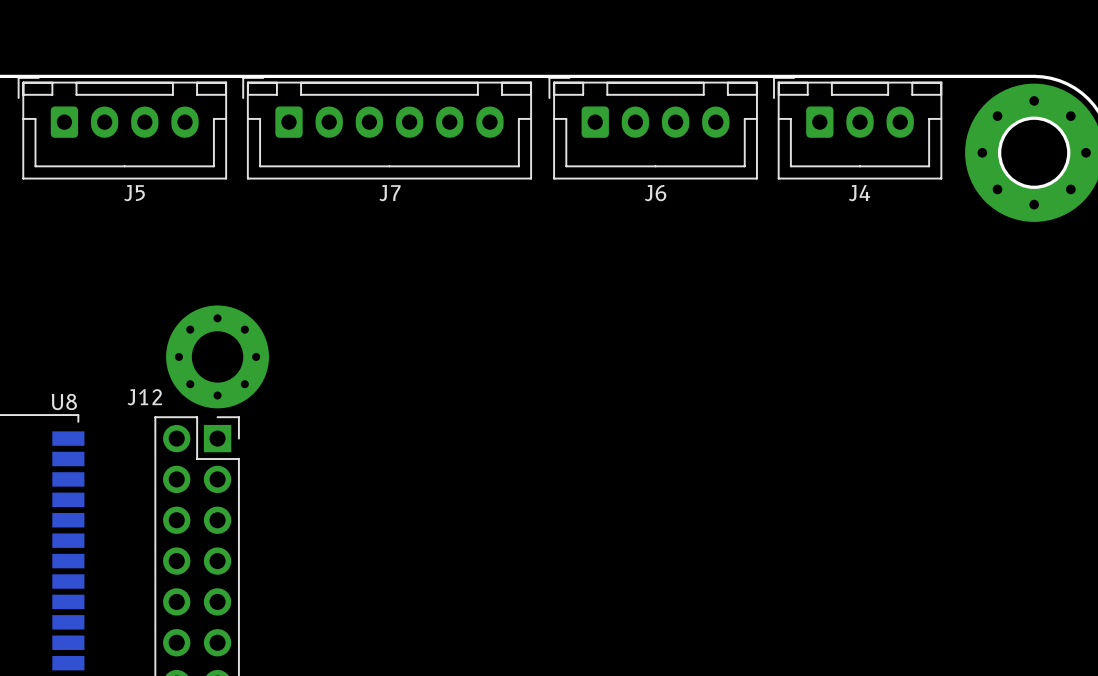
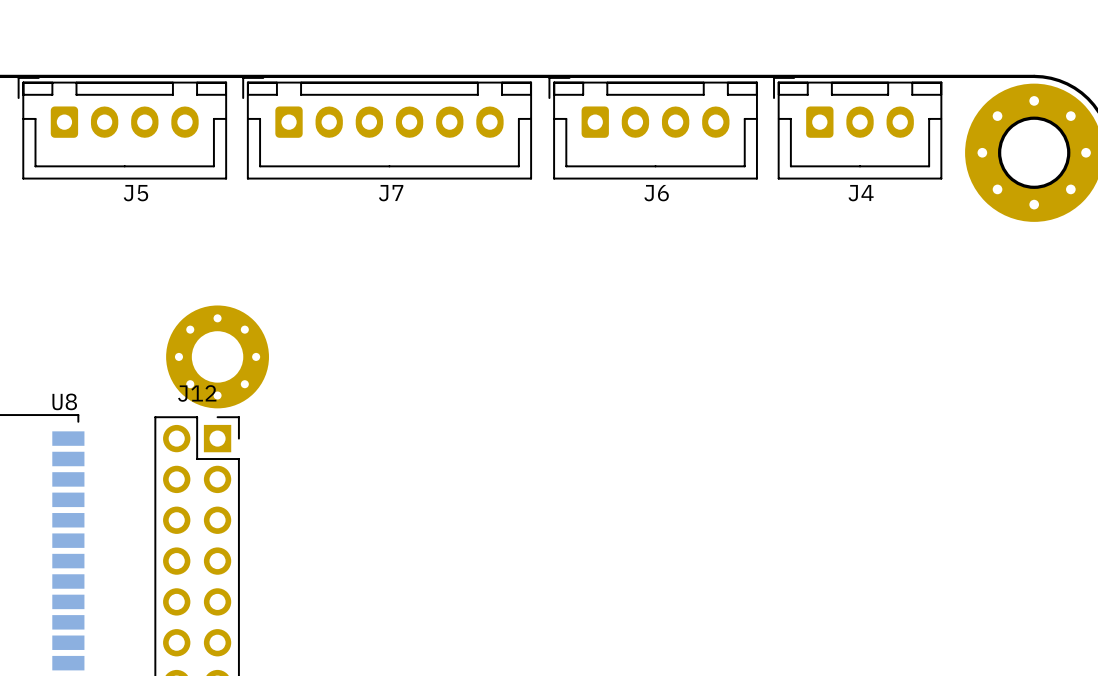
J12 name position: J12 (144, 397) -> J12 (197, 393)

